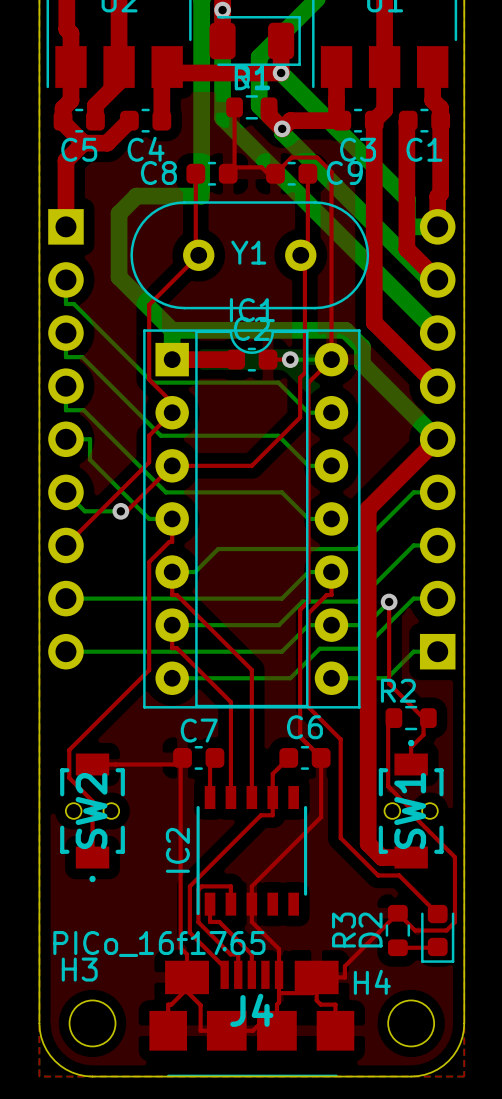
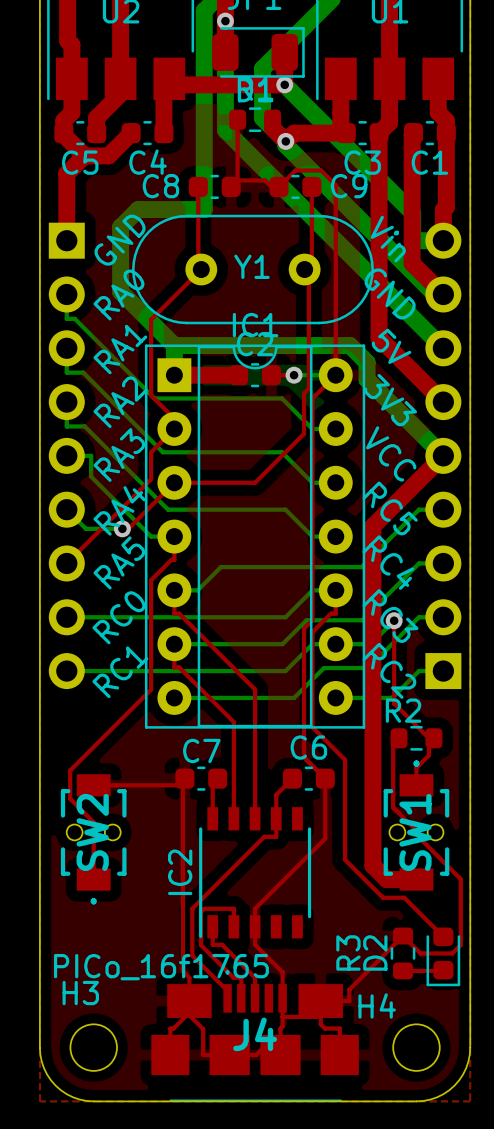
text: none -> Vin (388, 239)
text: none -> GND (120, 240)
text: none -> GND (390, 293)
text: none -> RA0 (118, 295)
text: none -> 5V (391, 346)
text: none -> RA1 (120, 349)
text: none -> 3V3 (390, 400)
text: none -> RA2 (120, 402)
text: none -> VCC (391, 453)
text: none -> RA3 (119, 454)
text: none -> RC5 (390, 508)
text: none -> RA4 (119, 510)
text: none -> RA5 (119, 562)
text: none -> RC4 (388, 562)
text: none -> RC3 (390, 615)
text: none -> RC0 (118, 617)
text: none -> RC2 (389, 670)
text: none -> RC1 (120, 672)

